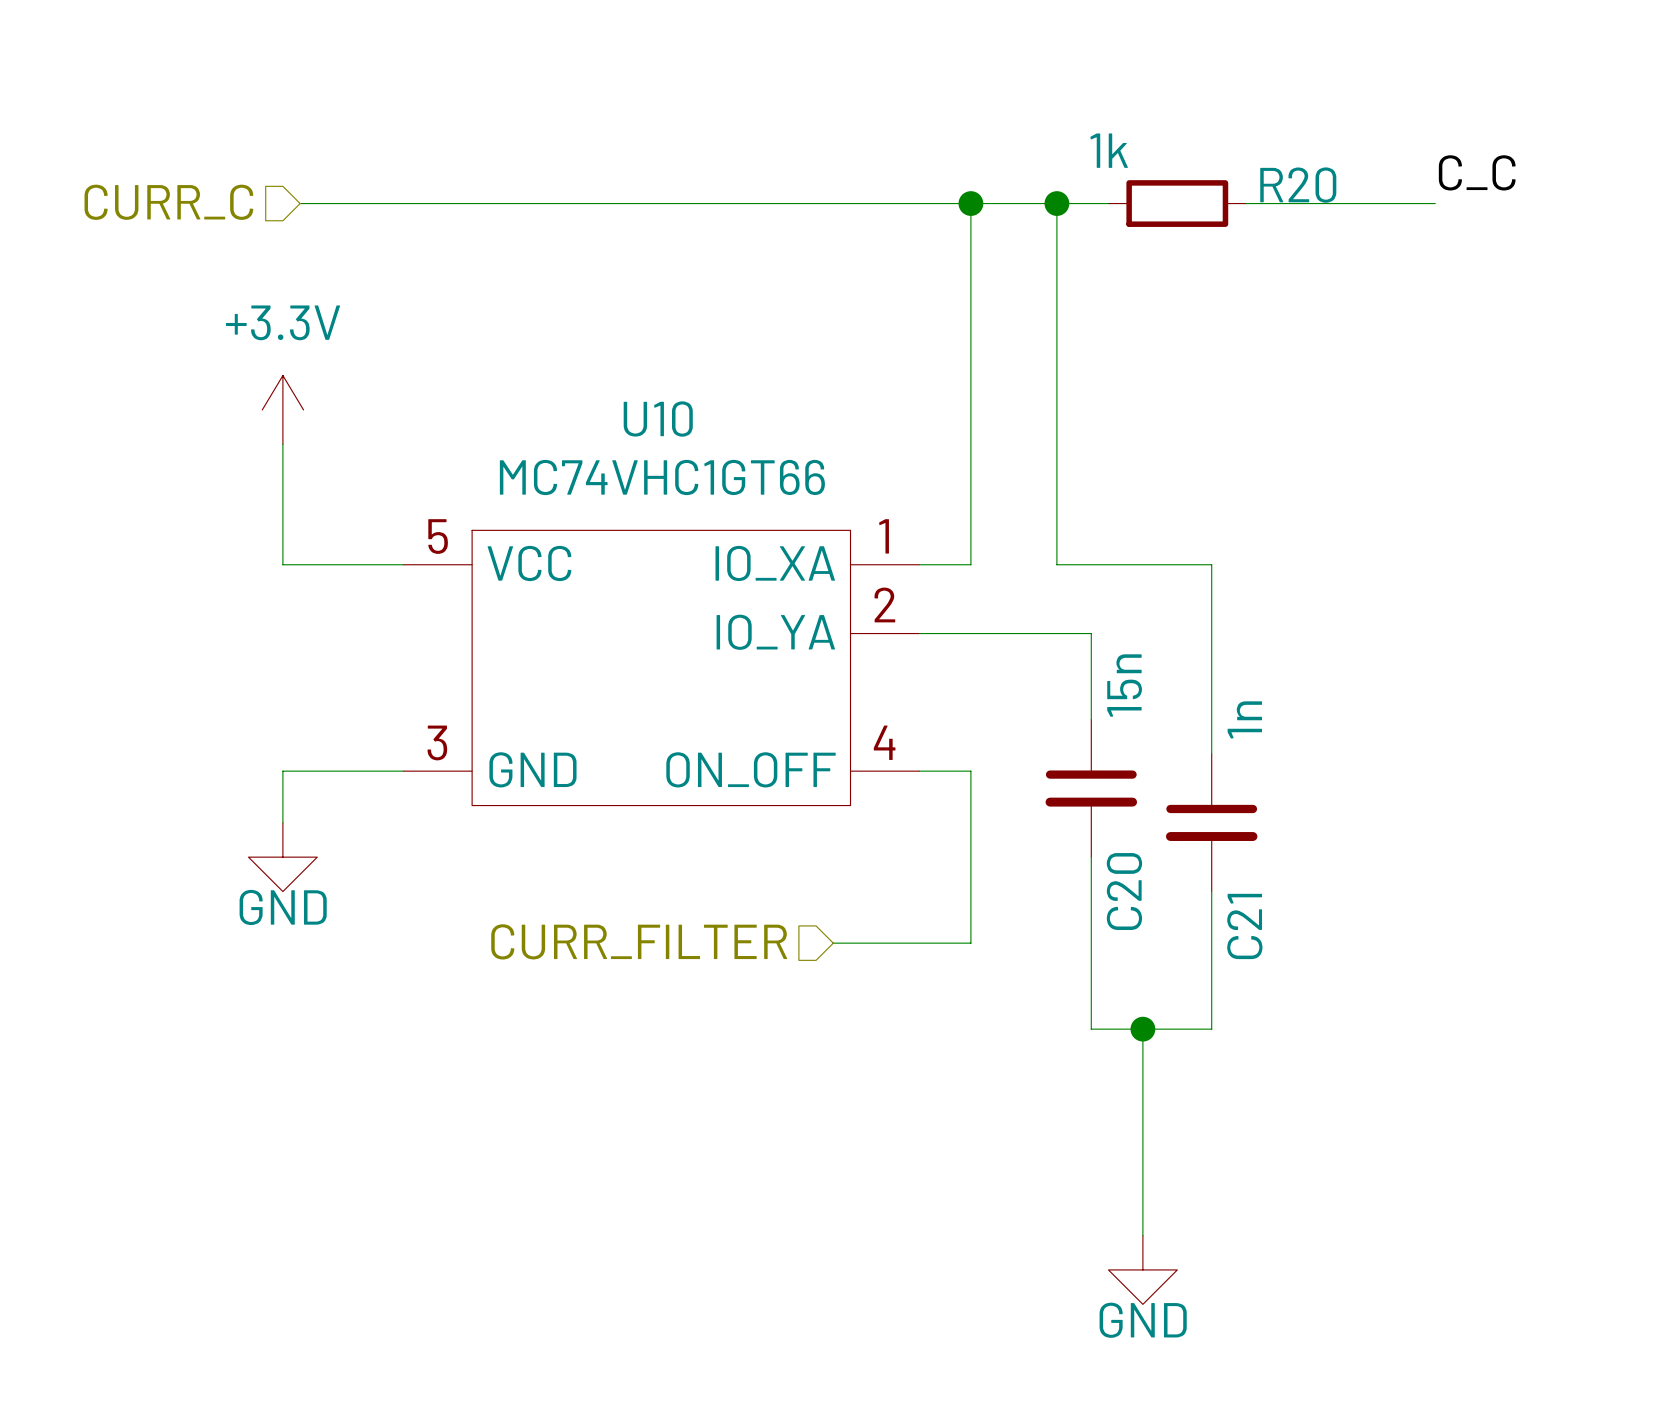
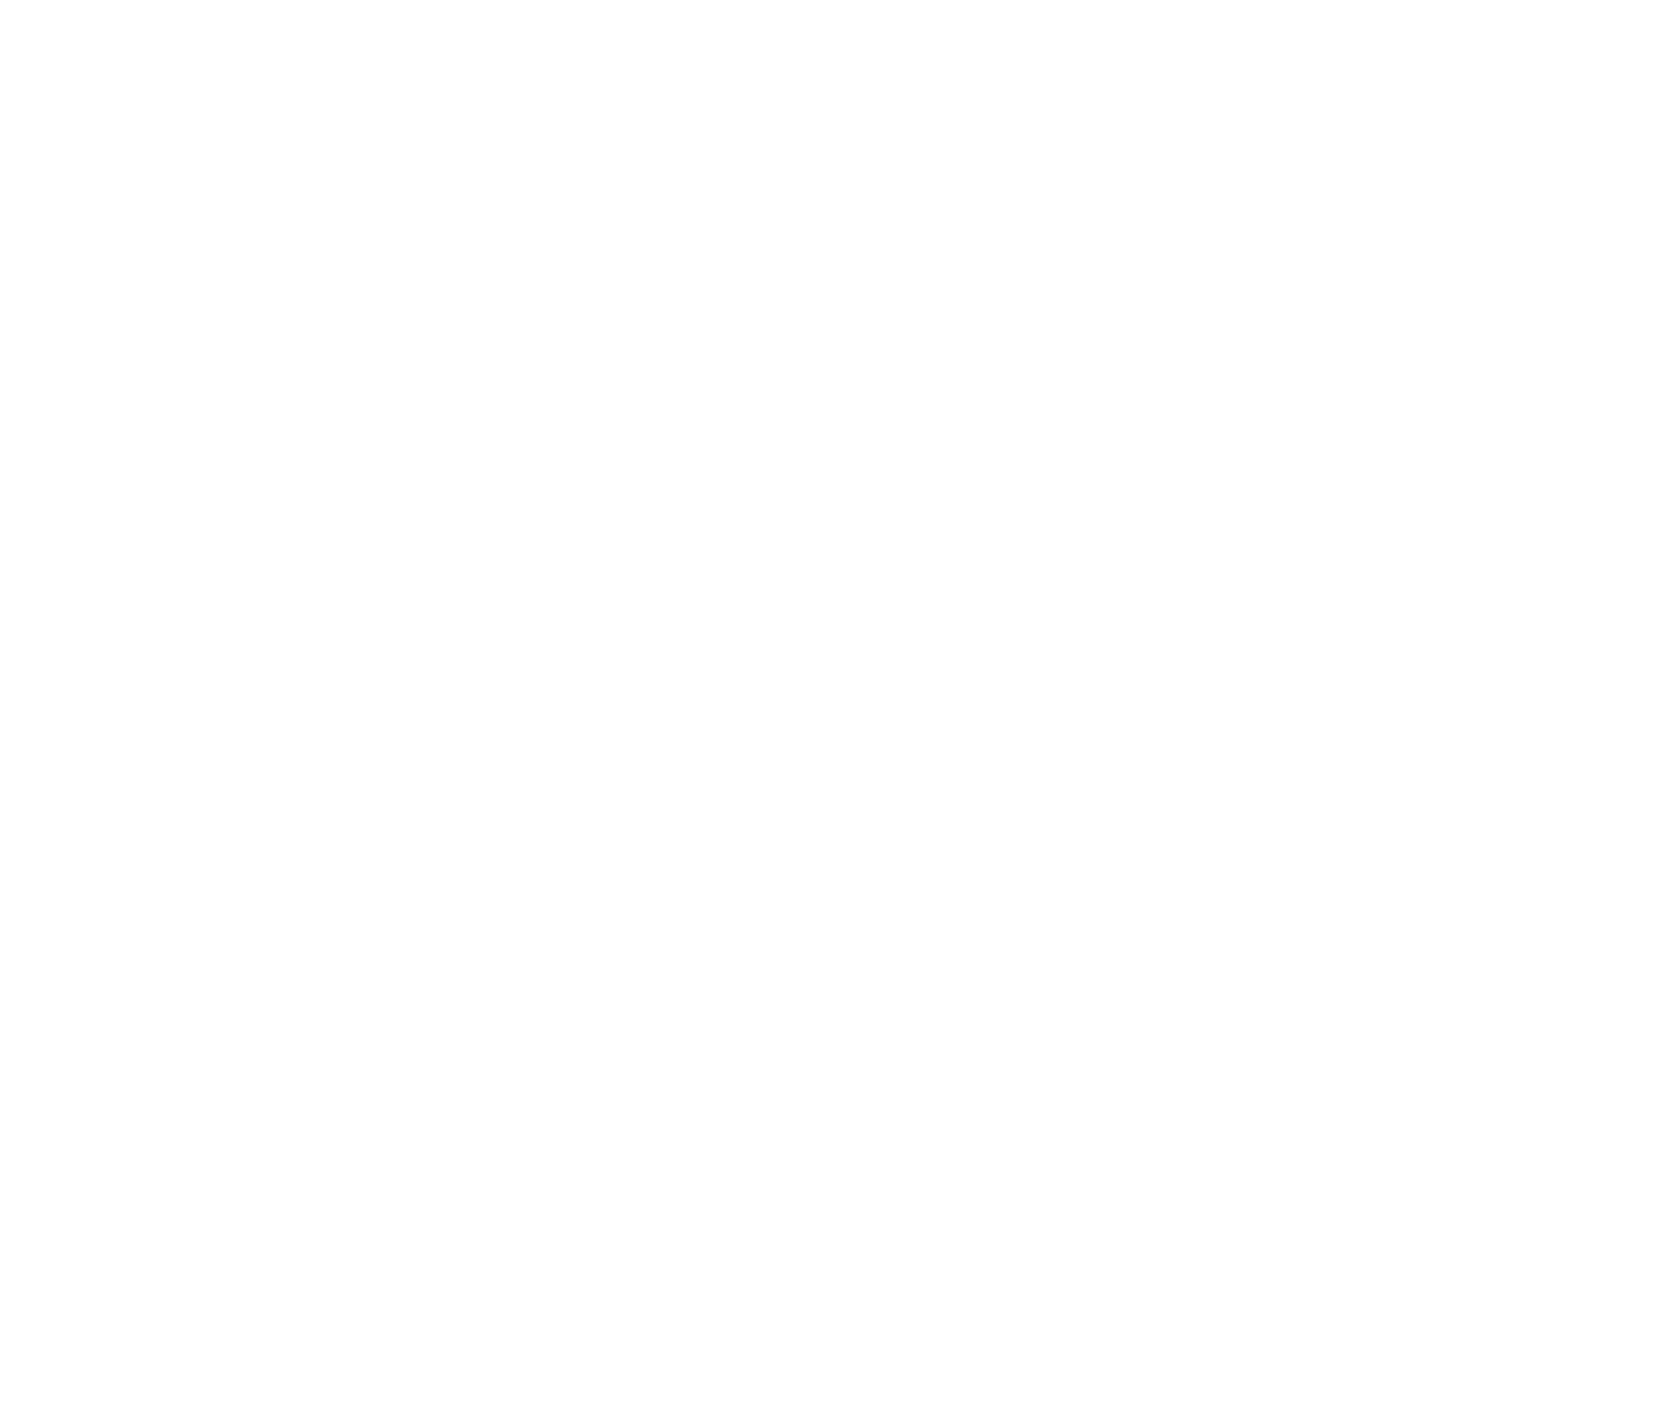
label: C_C (1477, 172) -> none
hierarchical label: CURR_C (168, 202) -> none
wire: (300, 203) (1108, 203) -> none
wire: (970, 203) (970, 564) (919, 564) -> none
junction: (970, 203) -> none
wire: (1056, 203) (1056, 564) (1211, 564) (1211, 753) -> none
junction: (1056, 203) -> none
R20: 1k (1177, 203) -> none
wire: (1246, 203) (1435, 203) -> none
power symbol: +3.3V (282, 409) -> none
wire: (282, 444) (282, 564) (403, 564) -> none
wire: (919, 633) (1091, 633) (1091, 719) -> none
U10: MC74VHC1GT66 (661, 667) -> none
wire: (403, 771) (282, 771) (282, 822) -> none
wire: (919, 771) (970, 771) (970, 943) (833, 943) -> none
C20: 15n (1091, 788) -> none
C21: 1n (1211, 822) -> none
power symbol: GND (282, 857) -> none
wire: (1091, 857) (1091, 1029) (1211, 1029) (1211, 891) -> none
hierarchical label: CURR_FILTER (639, 941) -> none
wire: (1142, 1029) (1142, 1235) -> none
junction: (1142, 1029) -> none
power symbol: GND (1142, 1269) -> none

